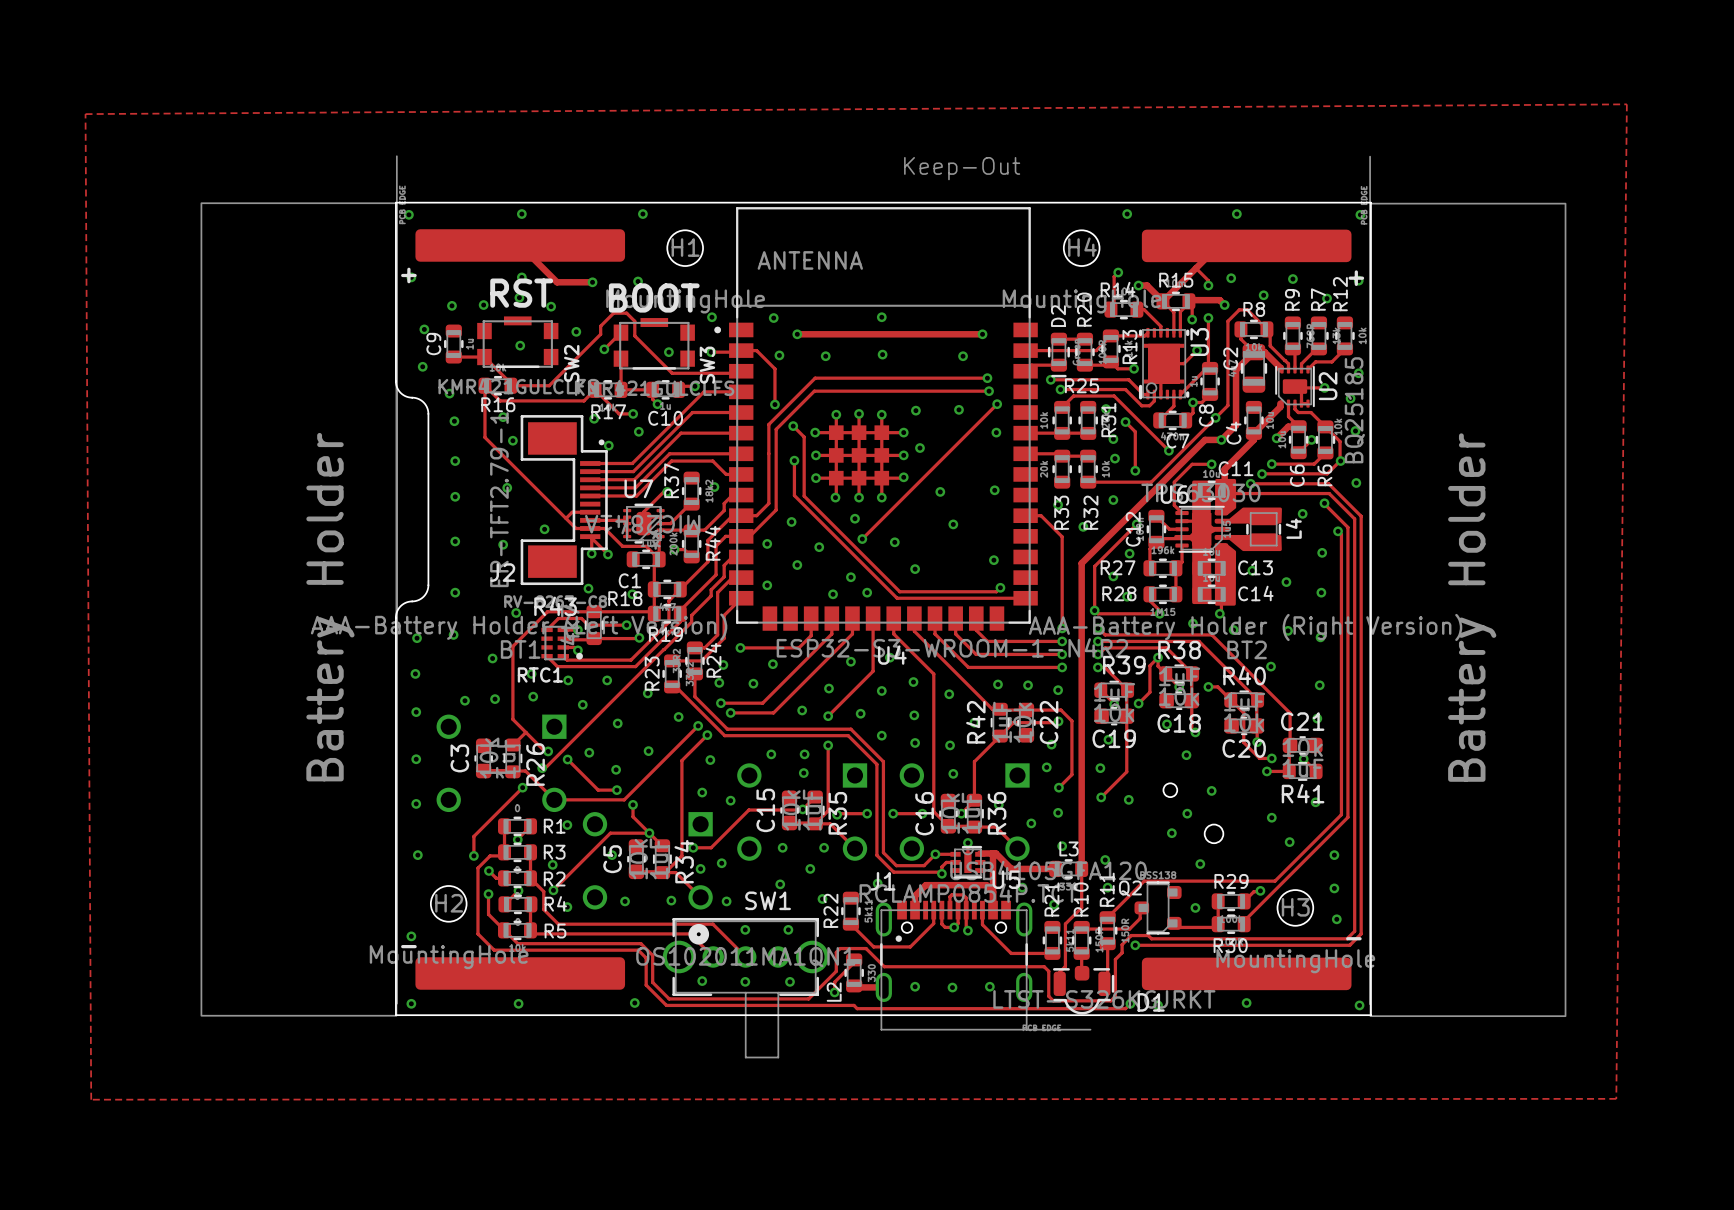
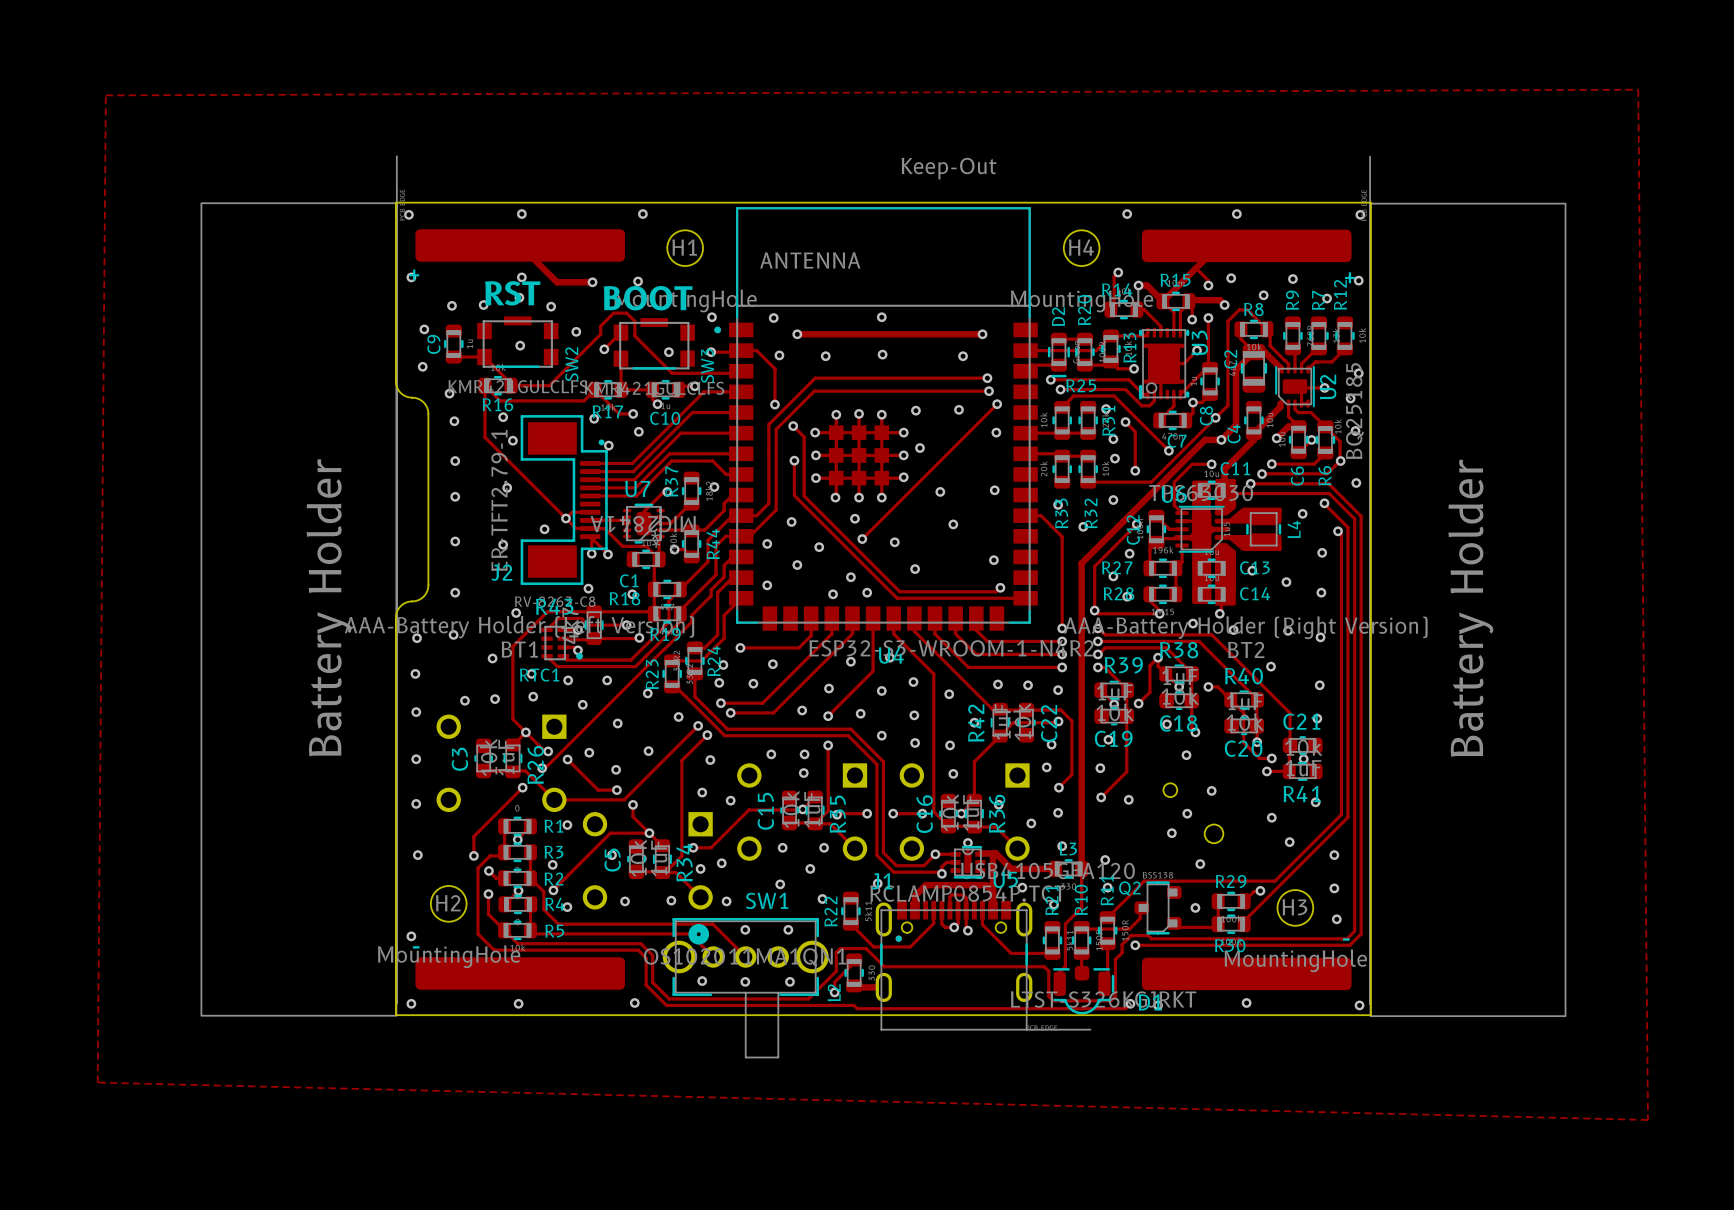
zone outline: (1626, 104) (85, 114) (91, 1099) (1616, 1098) (1626, 104) -> (1638, 89) (105, 95) (97, 1082) (1648, 1119) (1638, 89)
via: none -> (565, 518)
via: none -> (525, 732)
via: (915, 986) -> none
via: (989, 986) -> none
via: (952, 987) -> none

